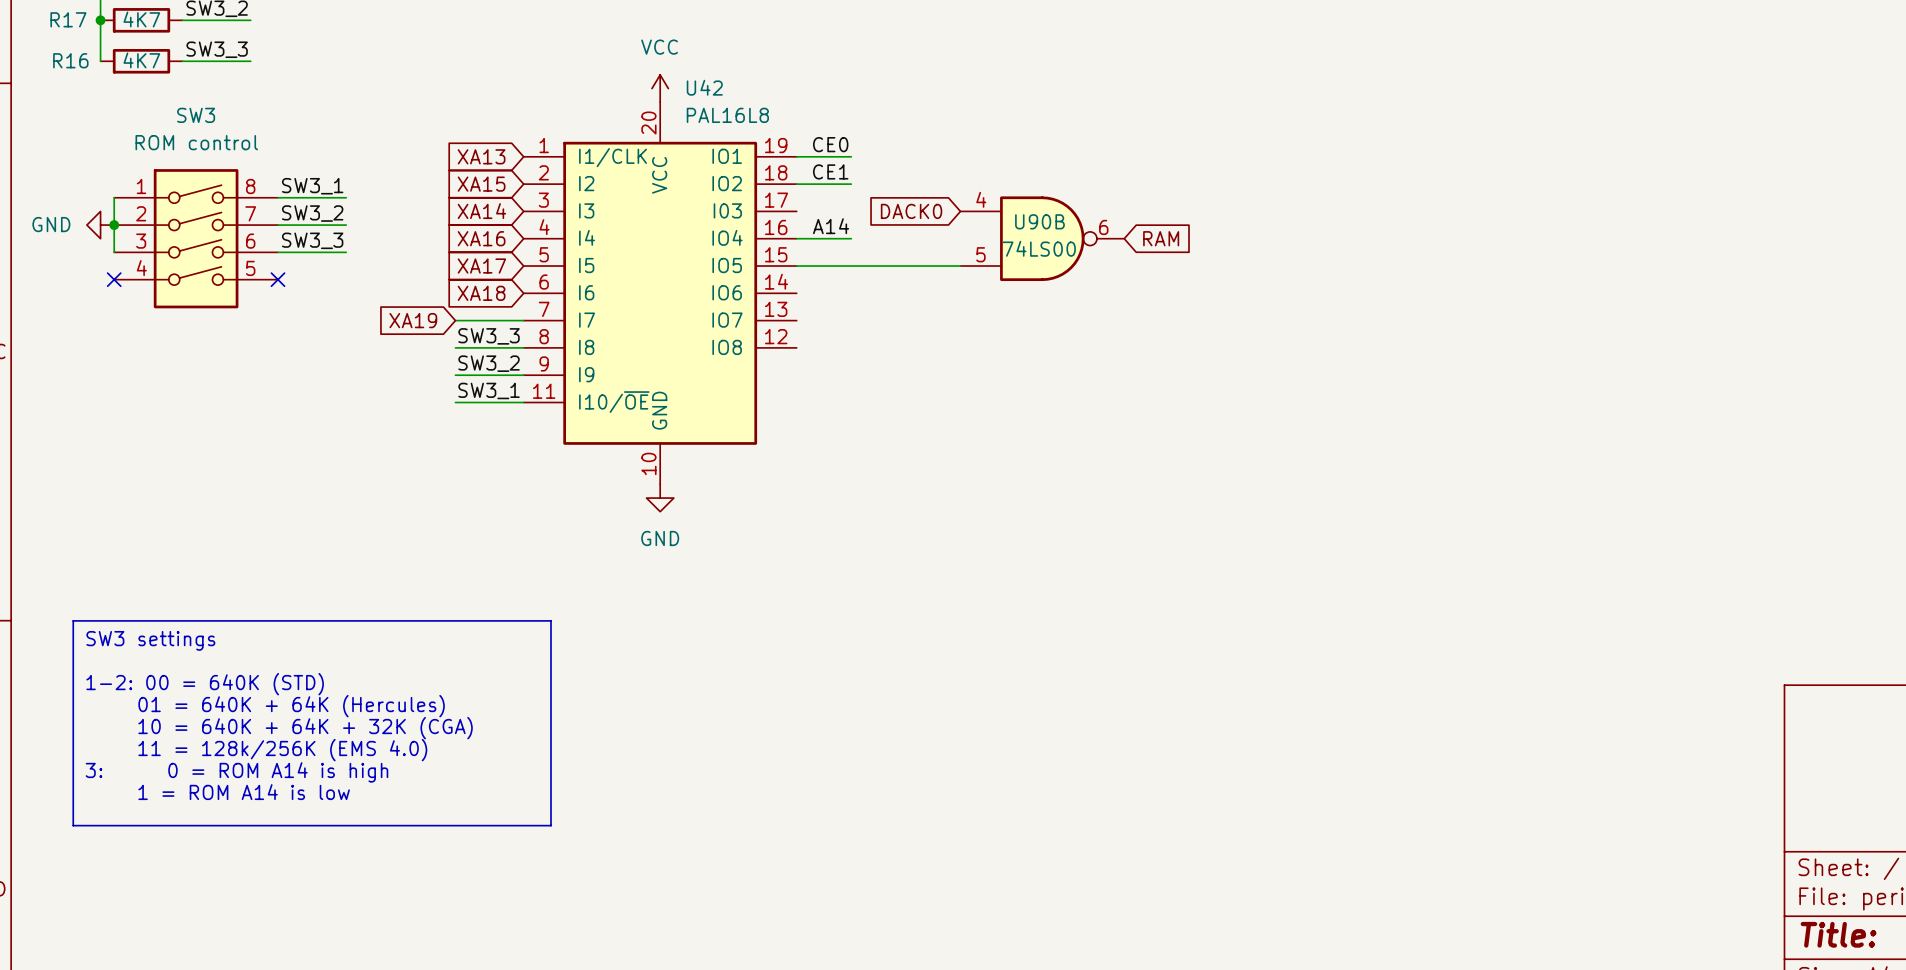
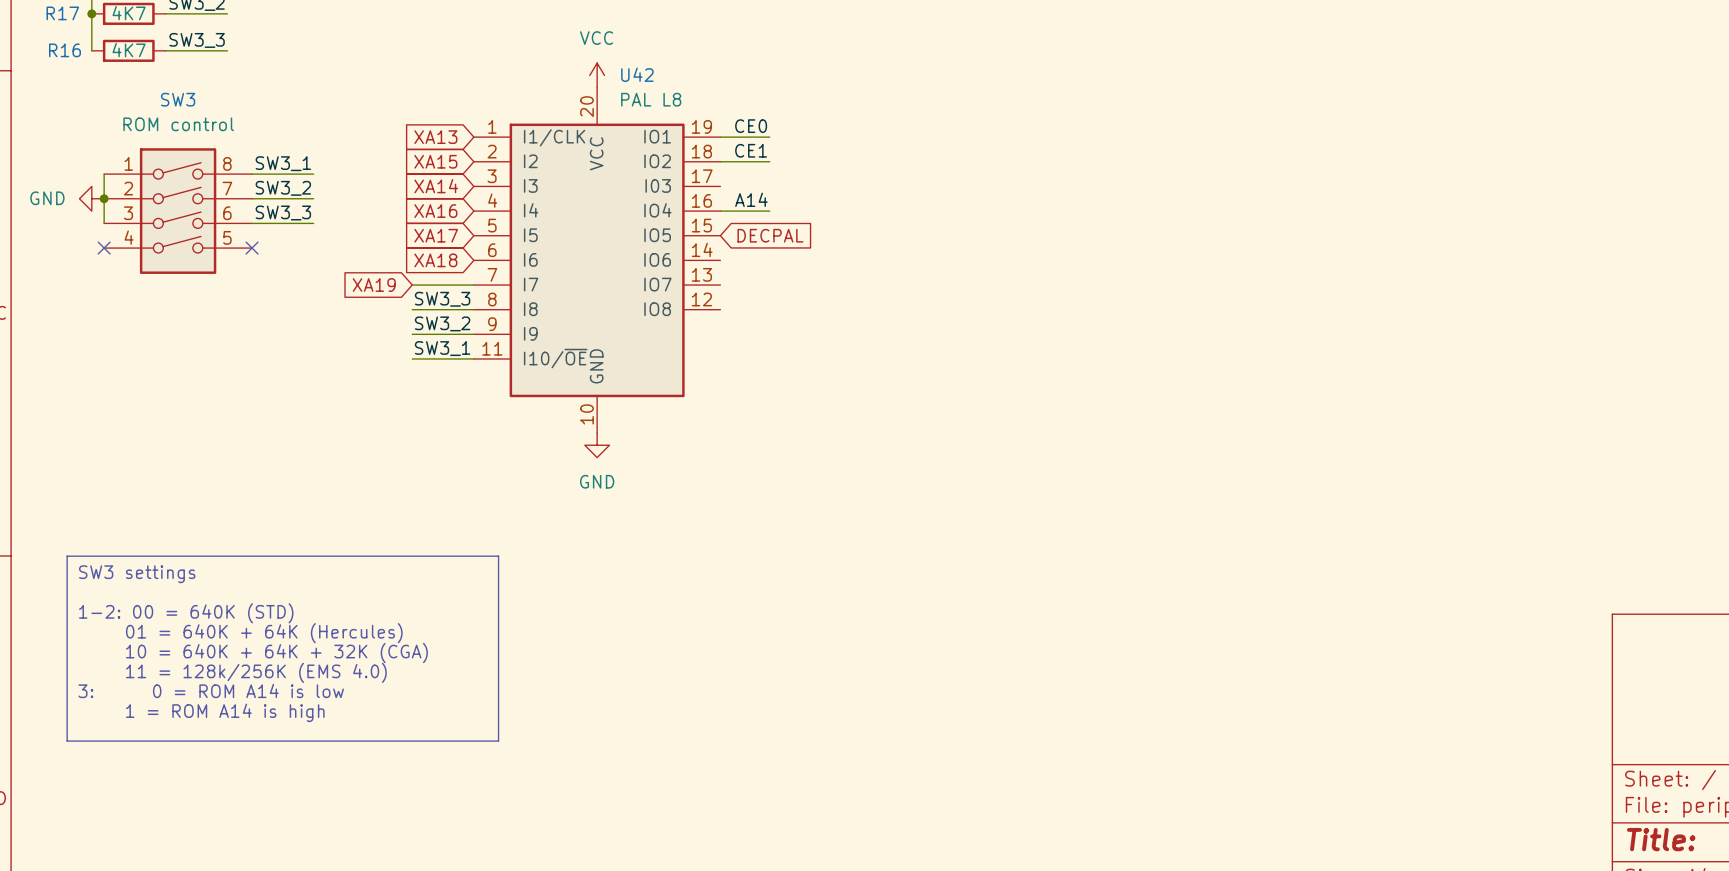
U42 value: PAL16L8 (727, 115) -> PAL L8 (651, 99)
global label: DACK0 (911, 211) -> none
U90B: 74LS00 (1042, 238) -> none
global label: RAM (1161, 238) -> none
wire: (796, 266) (960, 266) -> none
global label: none -> DECPAL (770, 235)
text: 3: 0 = ROM A14 is high (236, 772) -> 3: 0 = ROM A14 is low (211, 690)
text: 1 = ROM A14 is low (244, 792) -> 1 = ROM A14 is high (225, 712)

